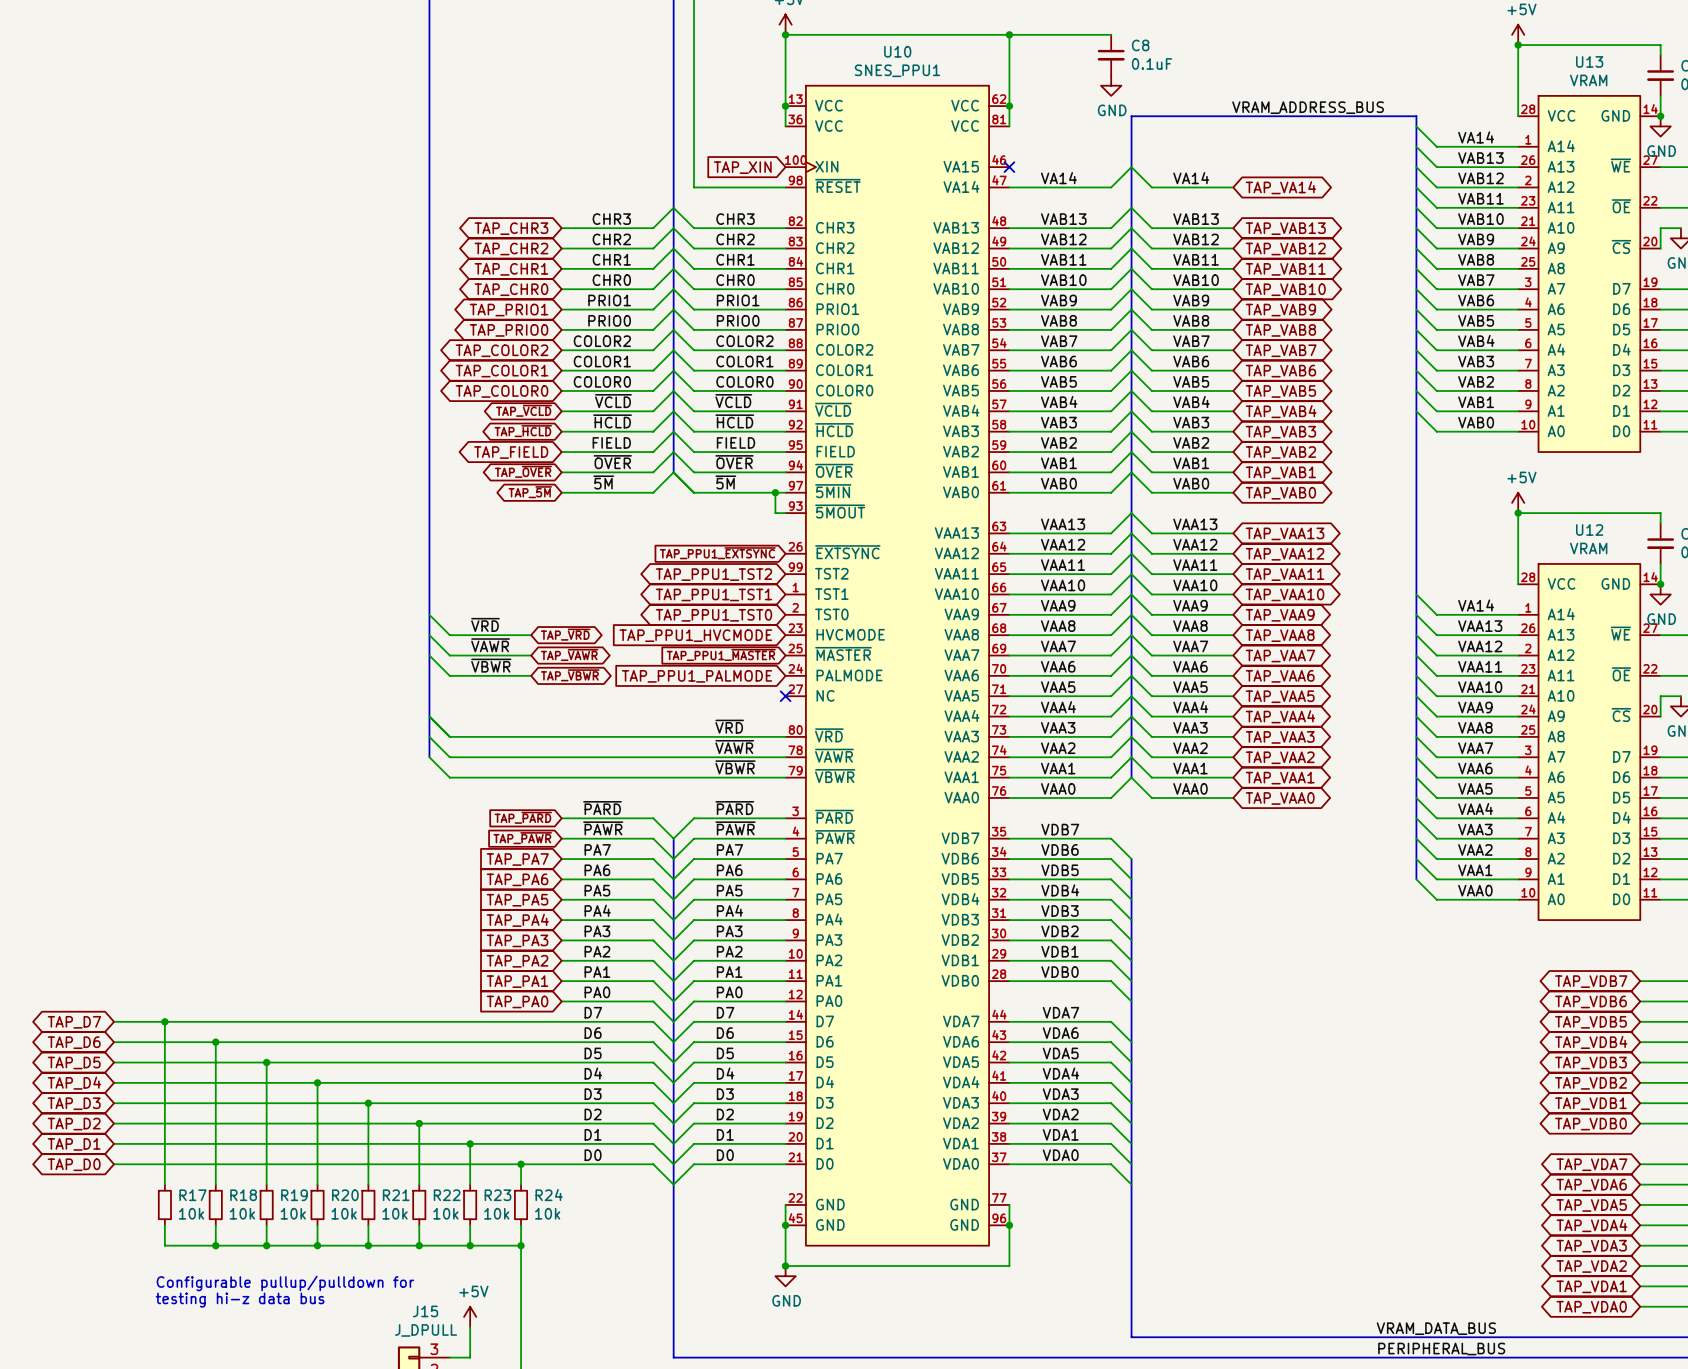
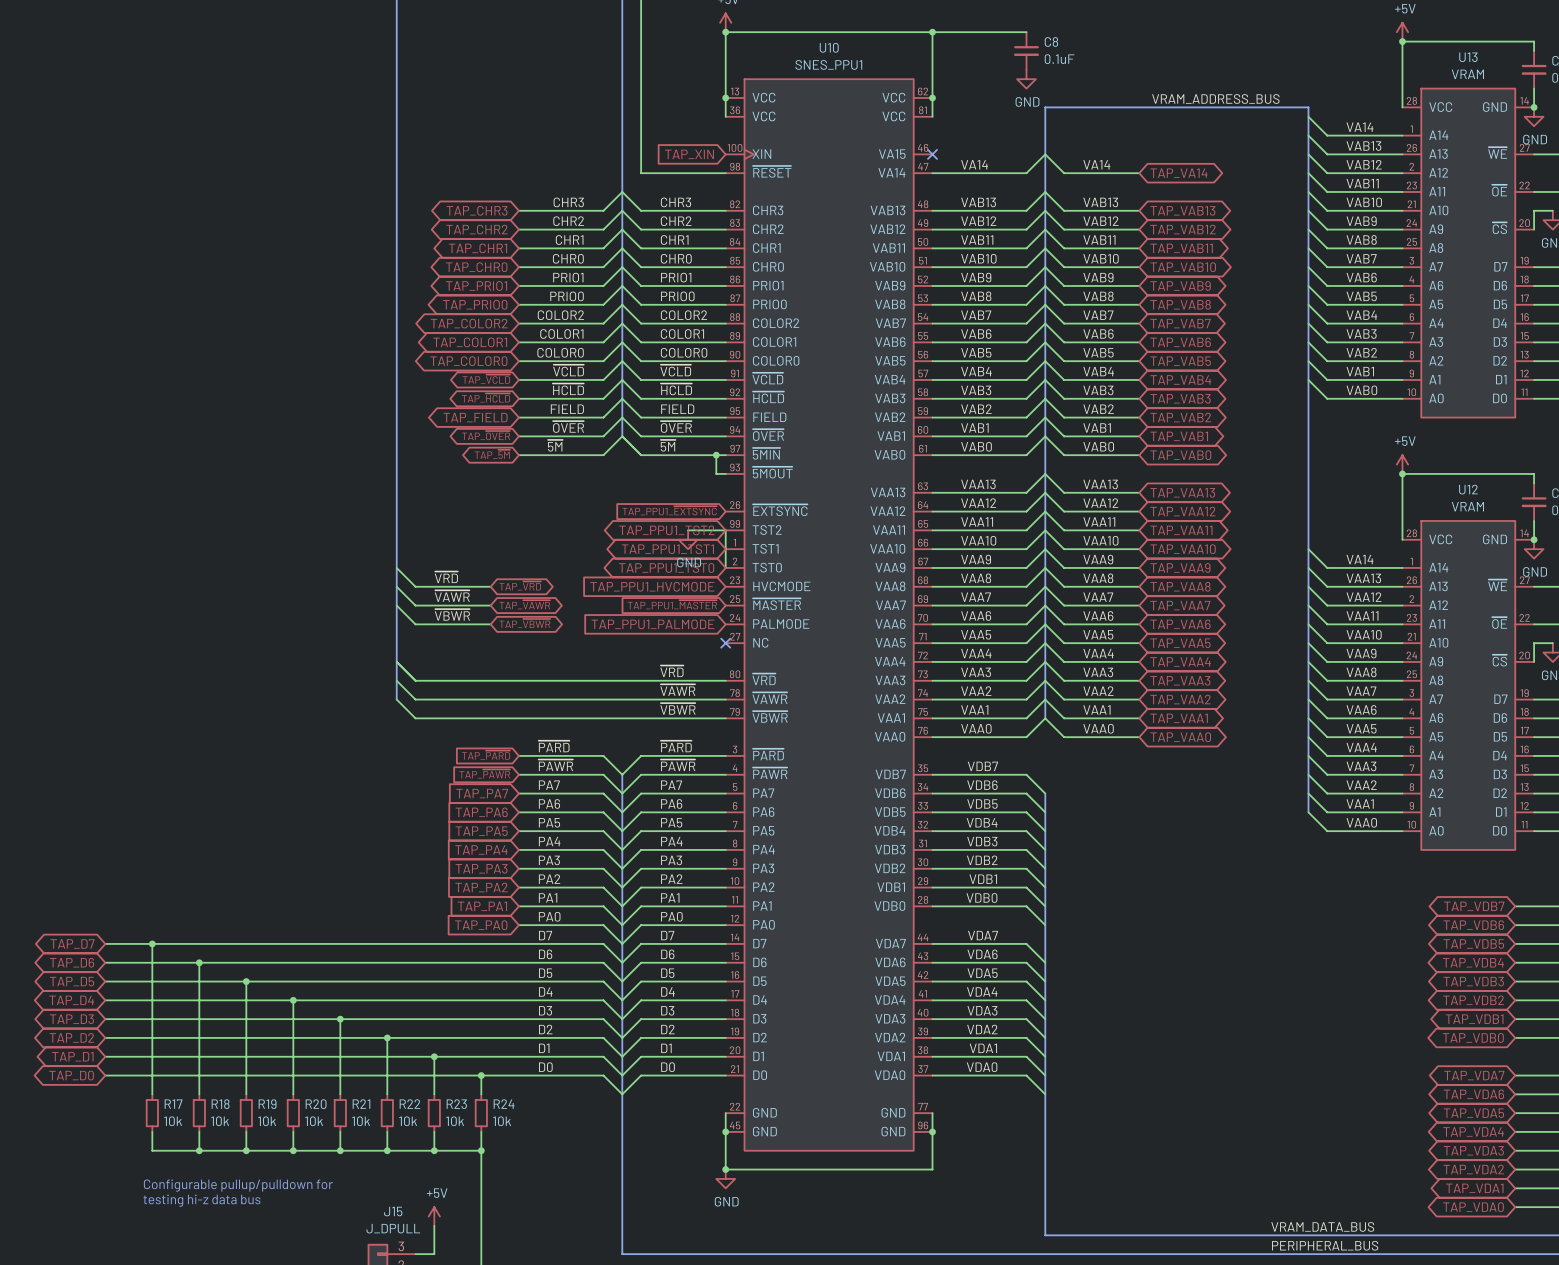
wire: none -> (688, 530) (725, 530) (725, 567)
power symbol: none -> GND (688, 539)

